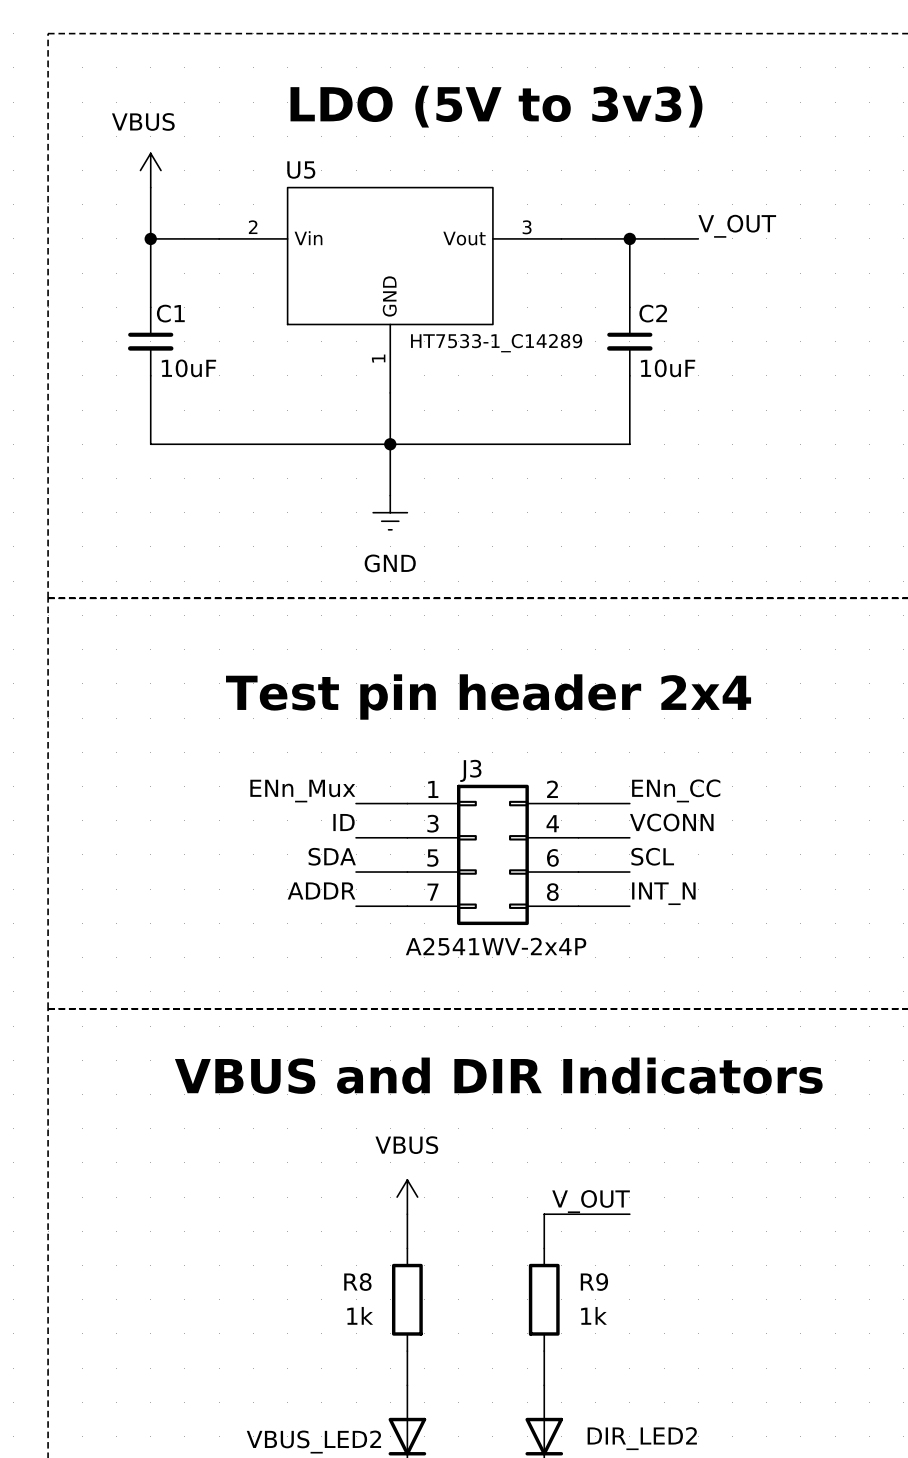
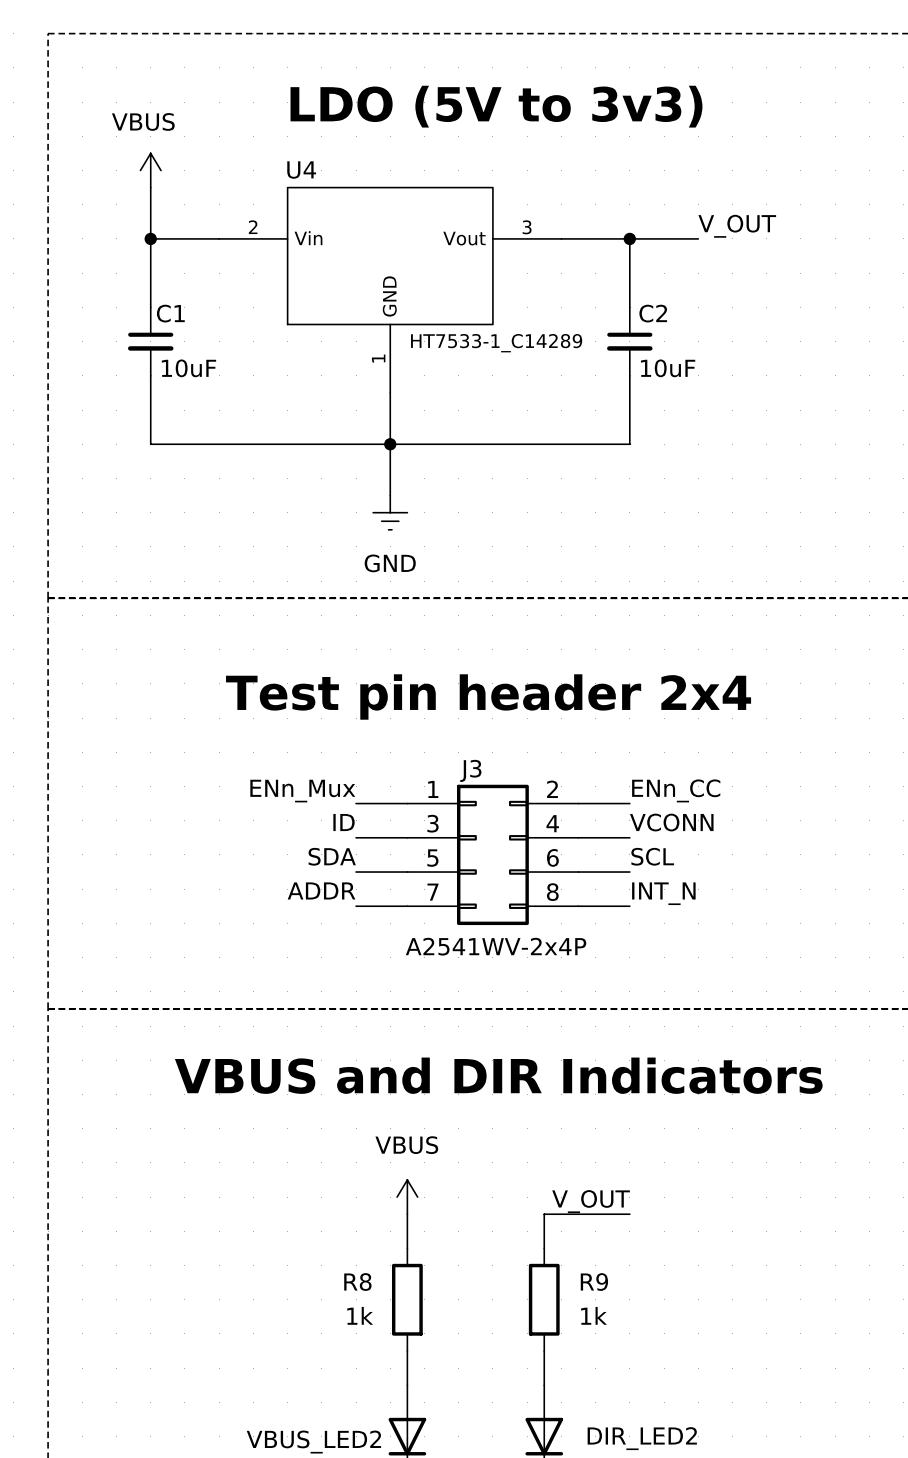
U5 name: U5 (301, 170) -> U4 (301, 170)

